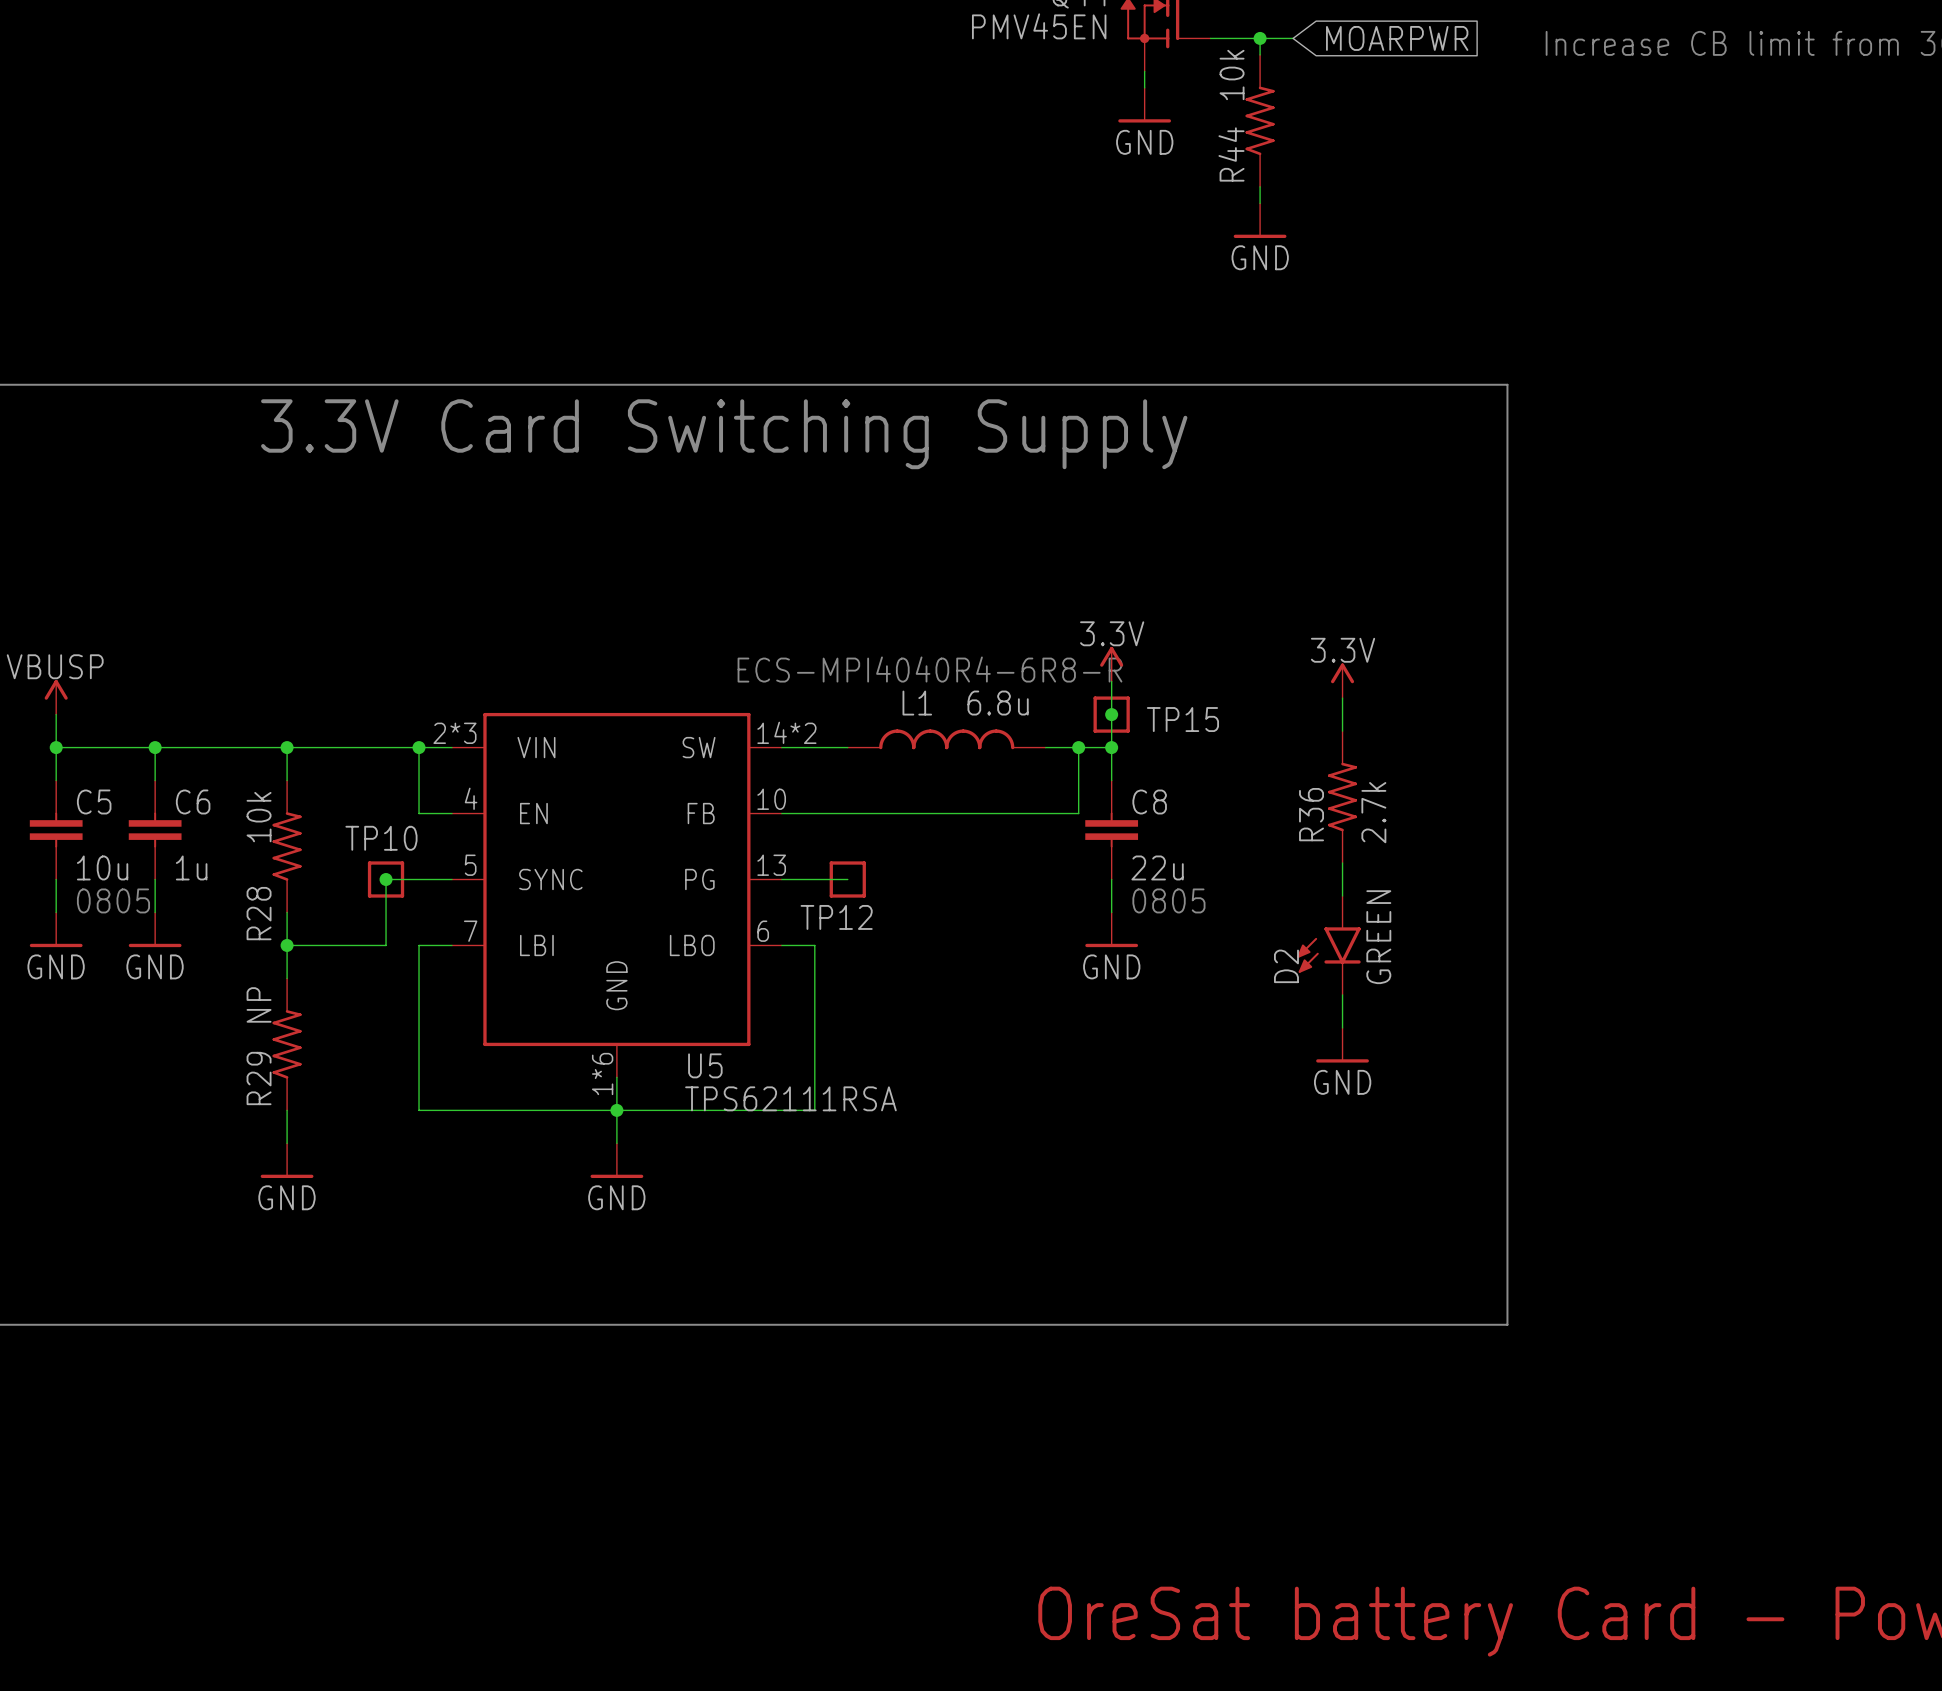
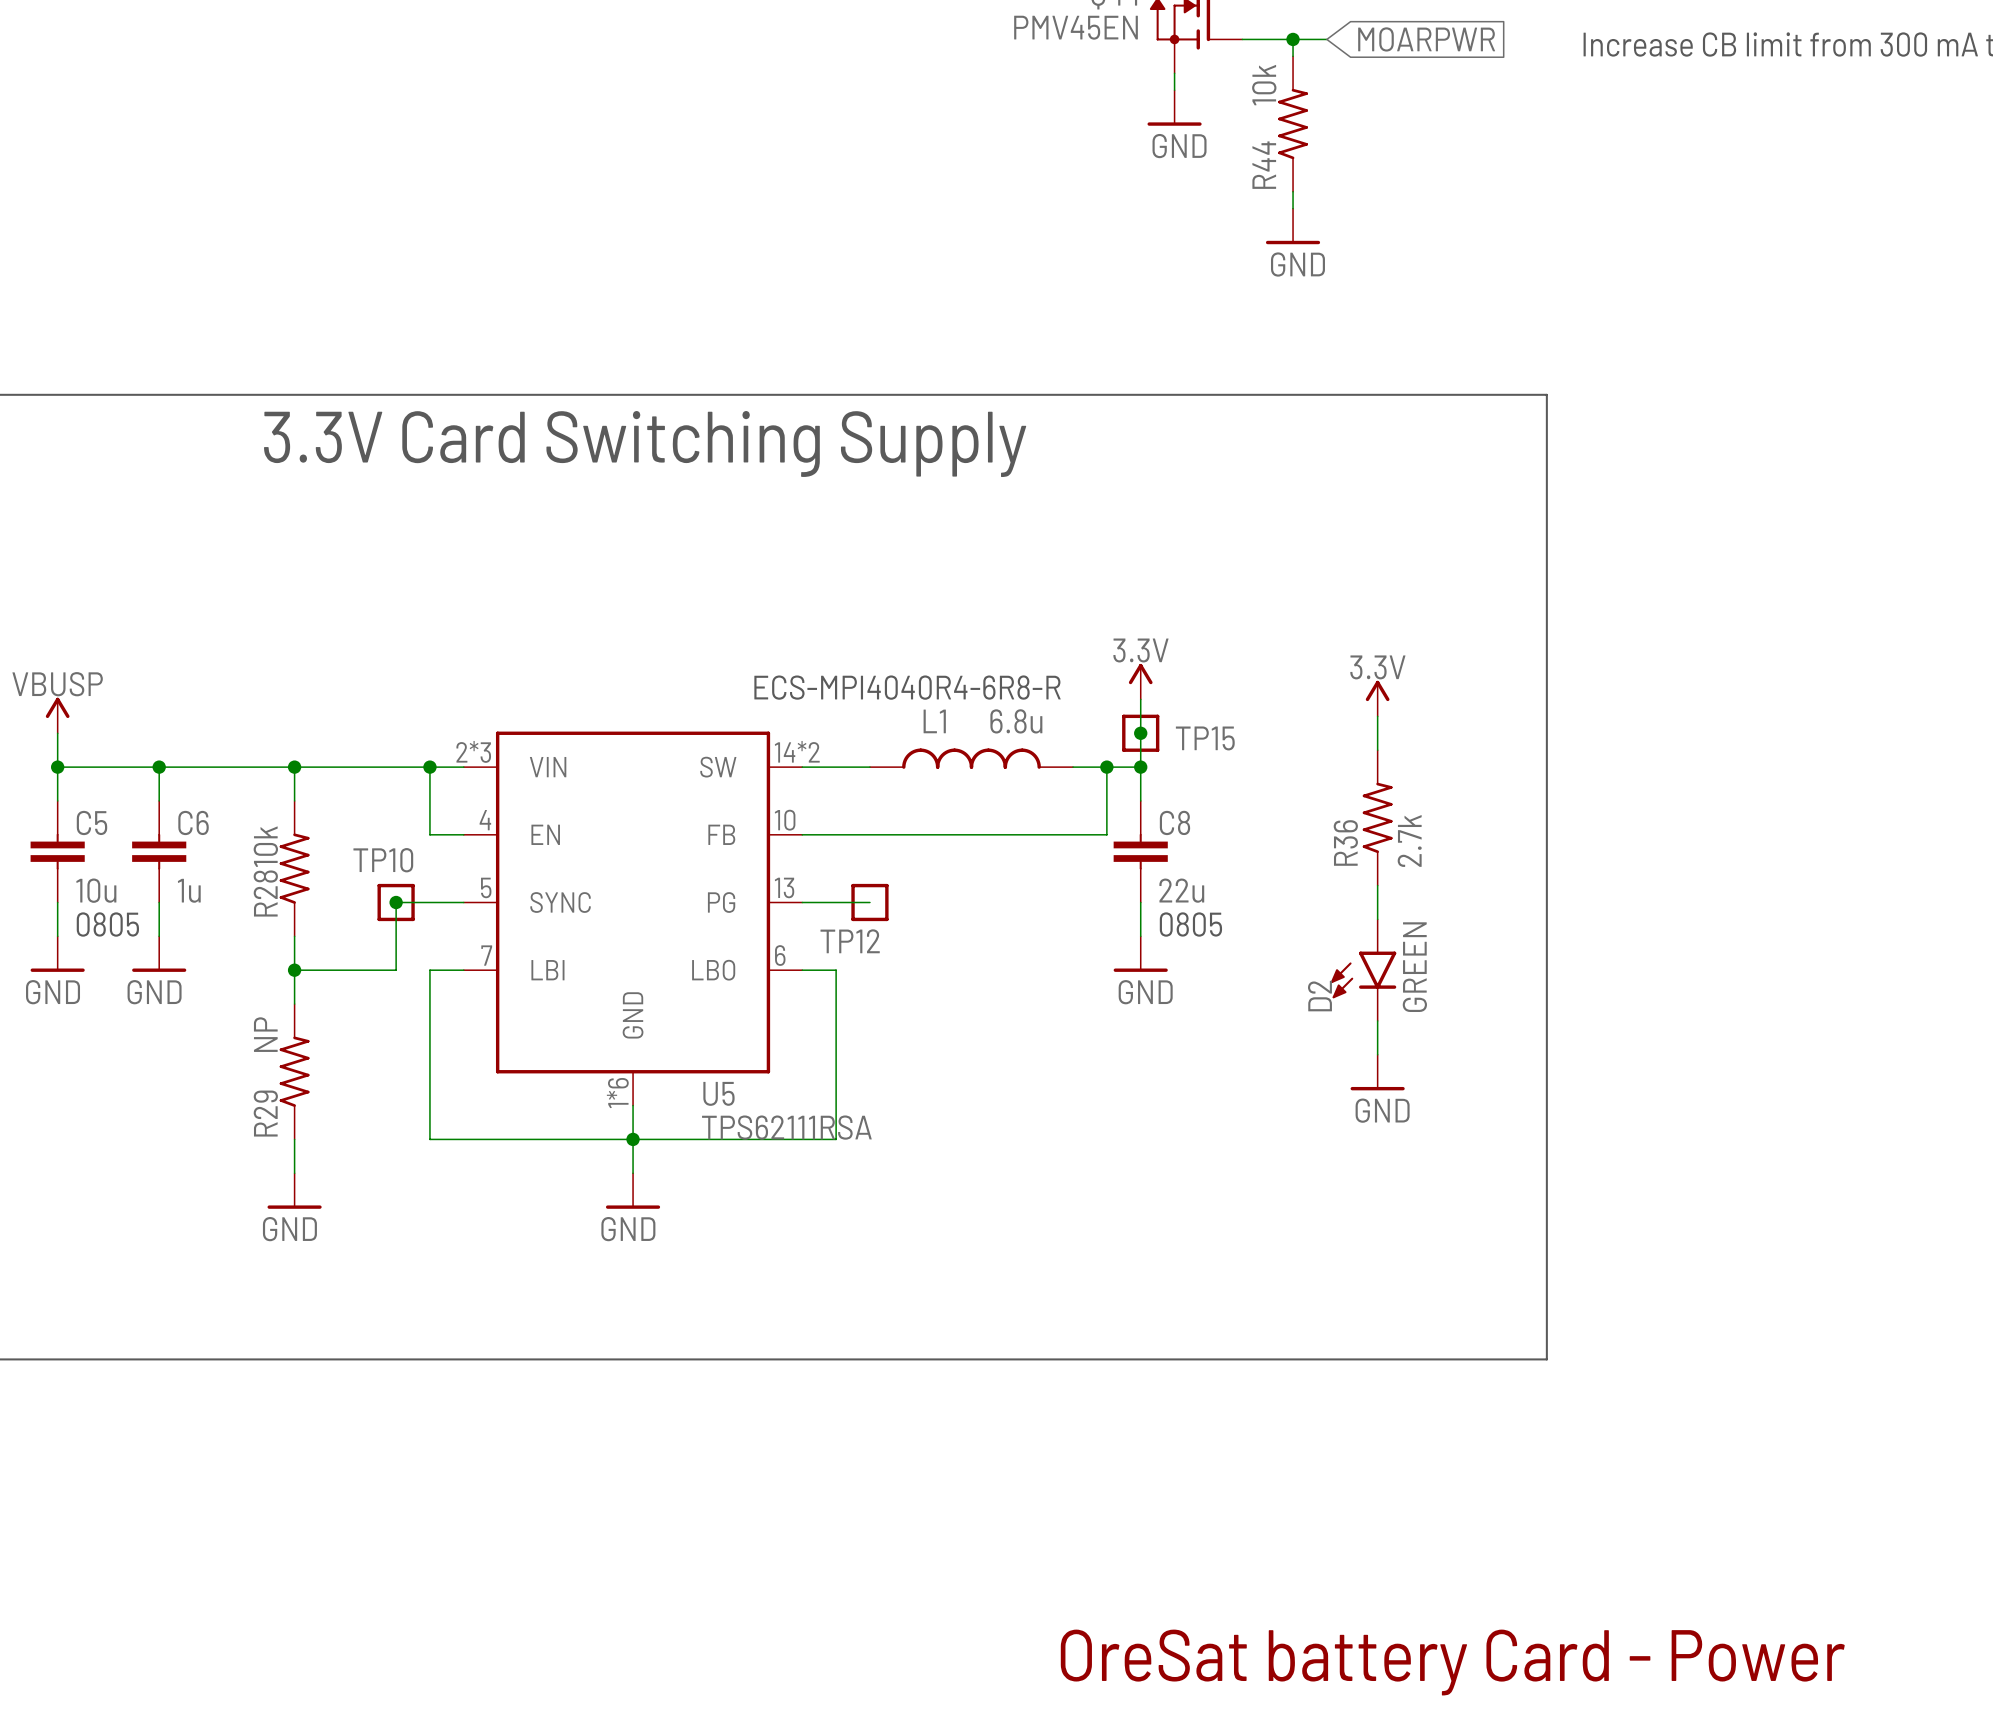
R28 name position: R28 (259, 913) -> R28 (265, 893)

